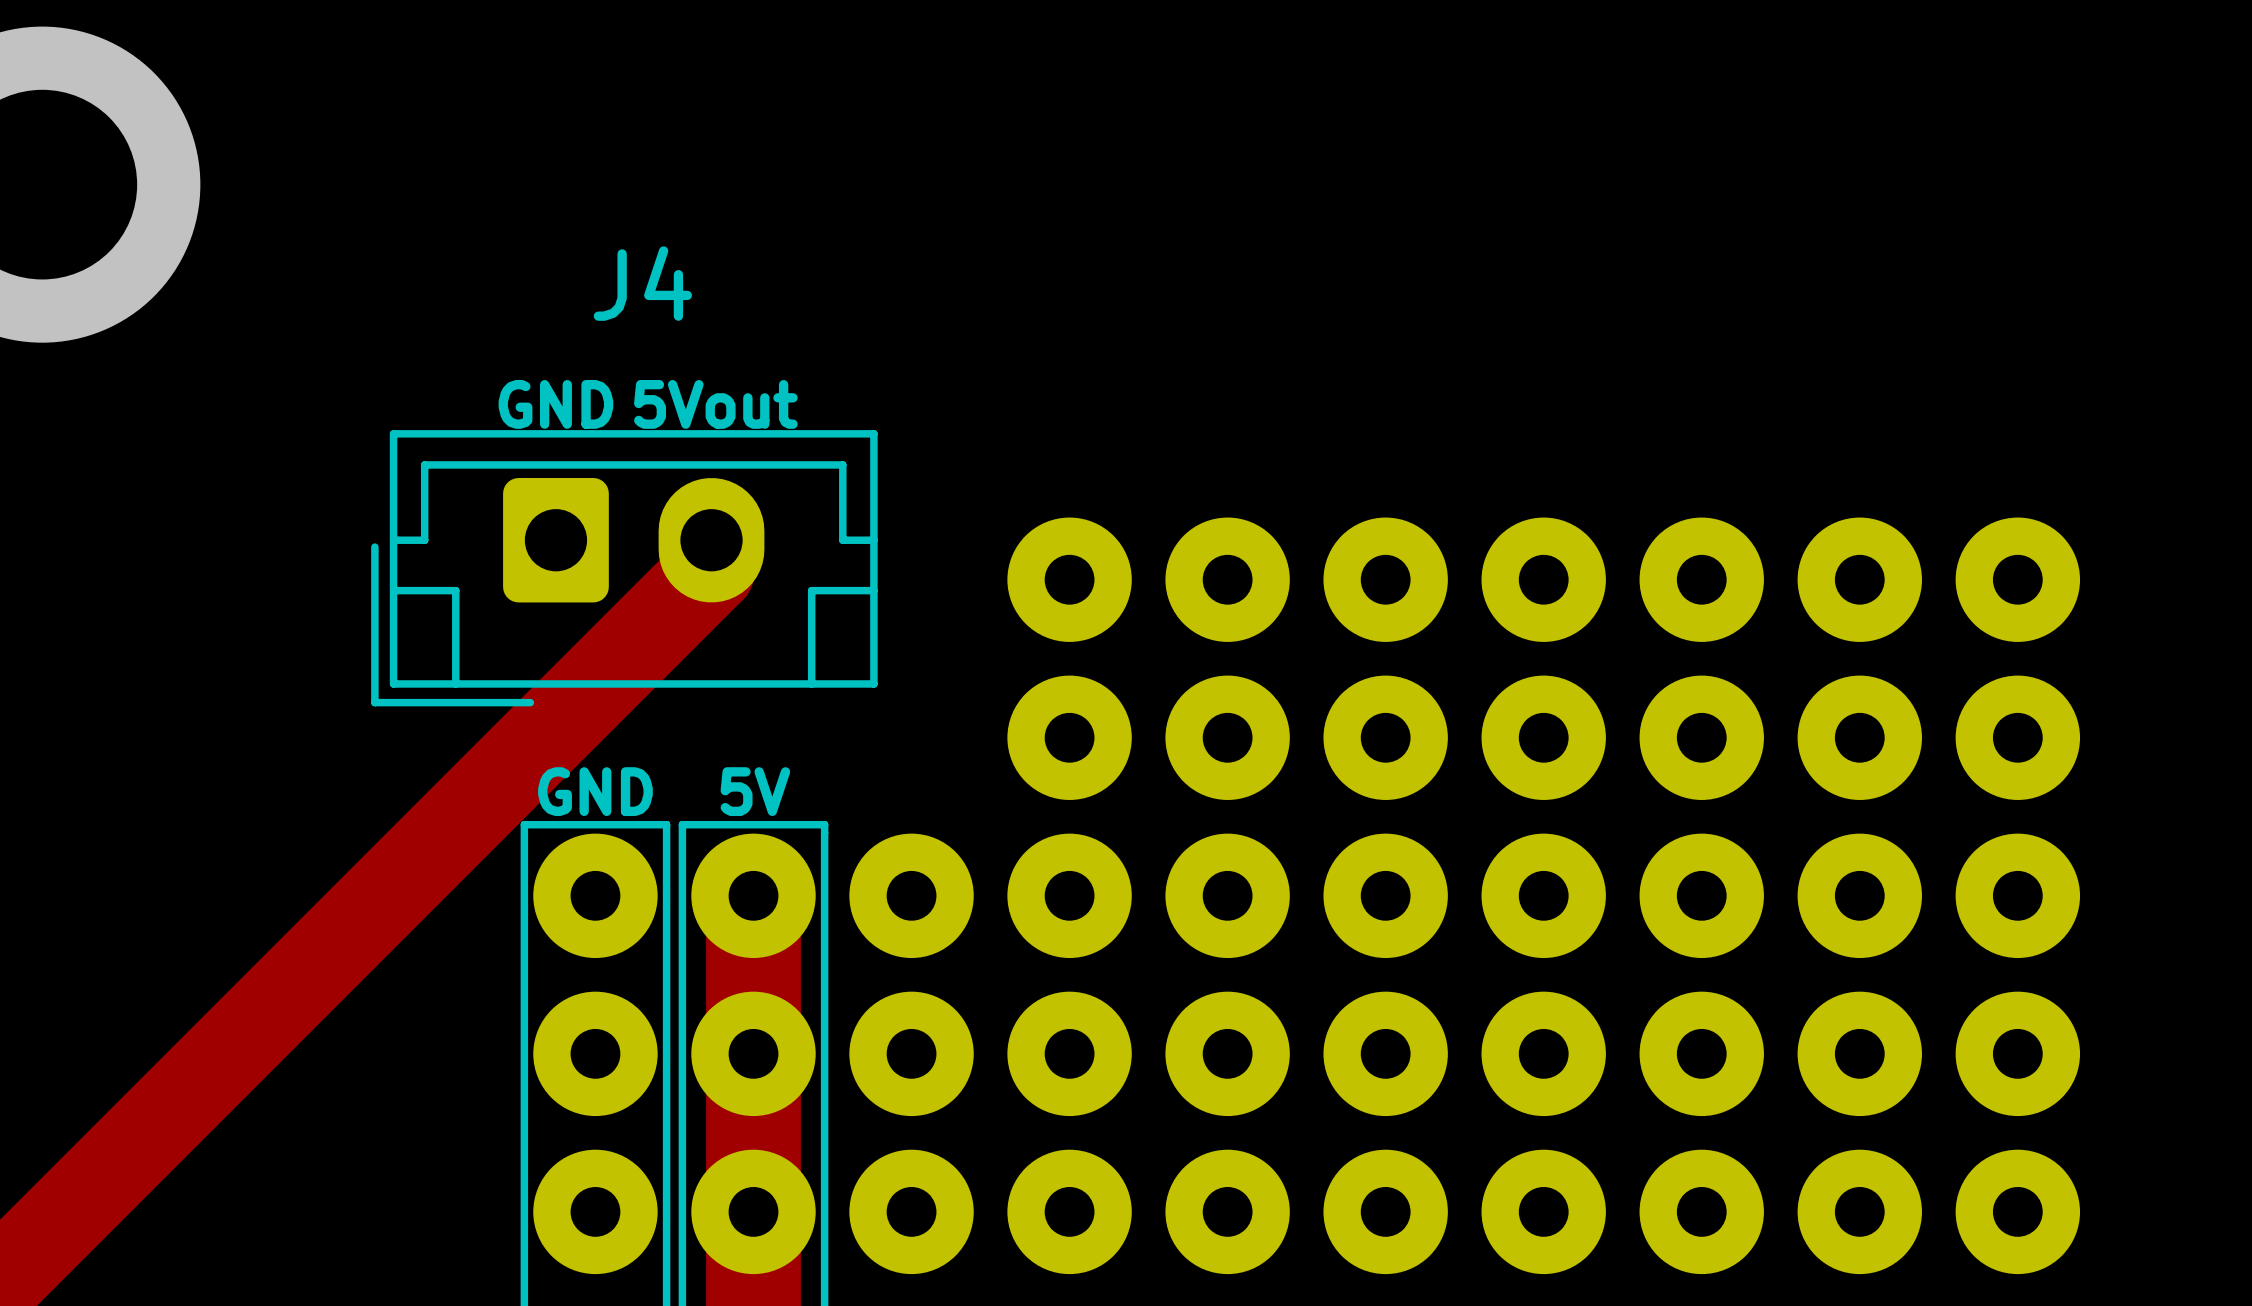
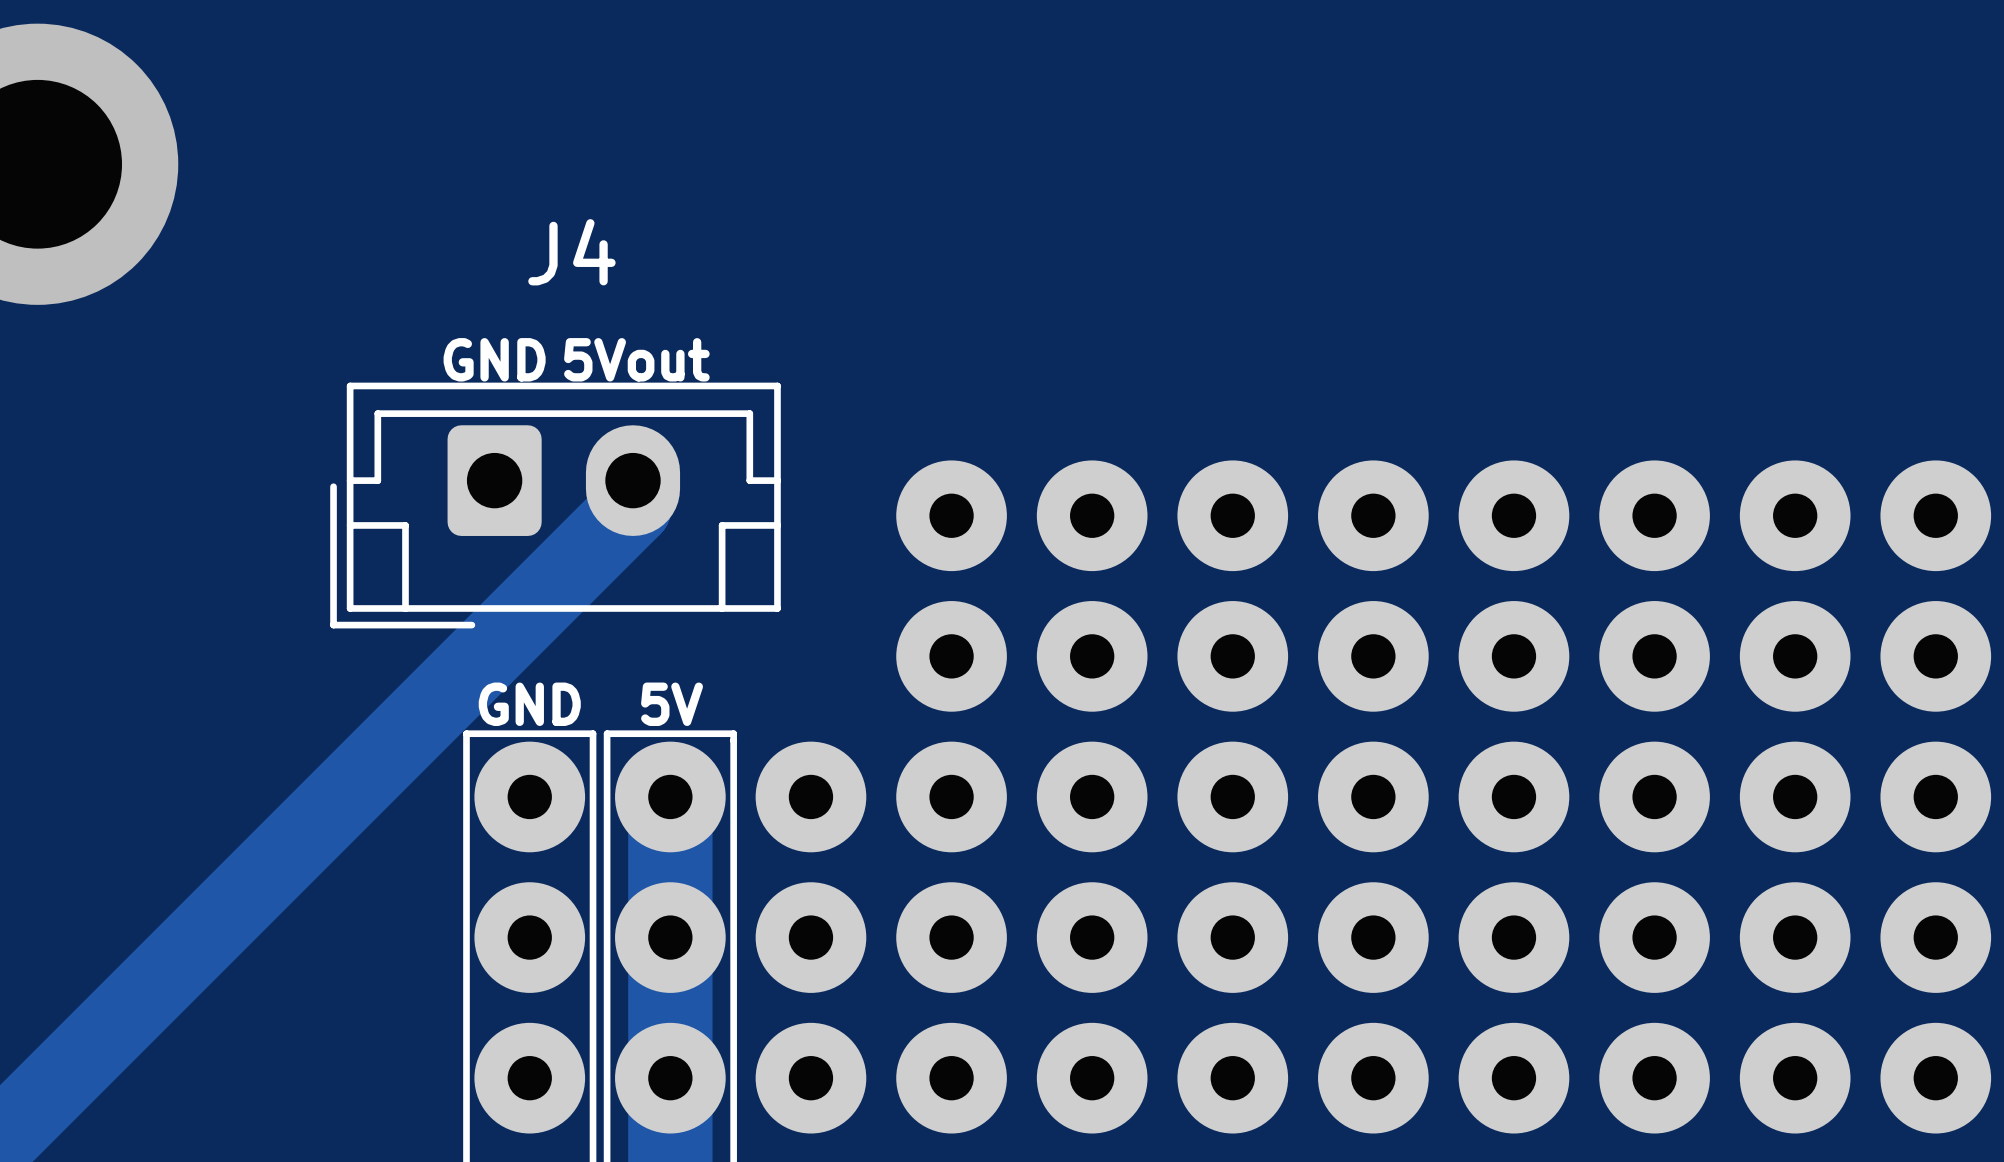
part: none -> (1935, 515)
part: none -> (1935, 656)
part: none -> (1935, 796)
part: none -> (1935, 937)
part: none -> (1935, 1078)

